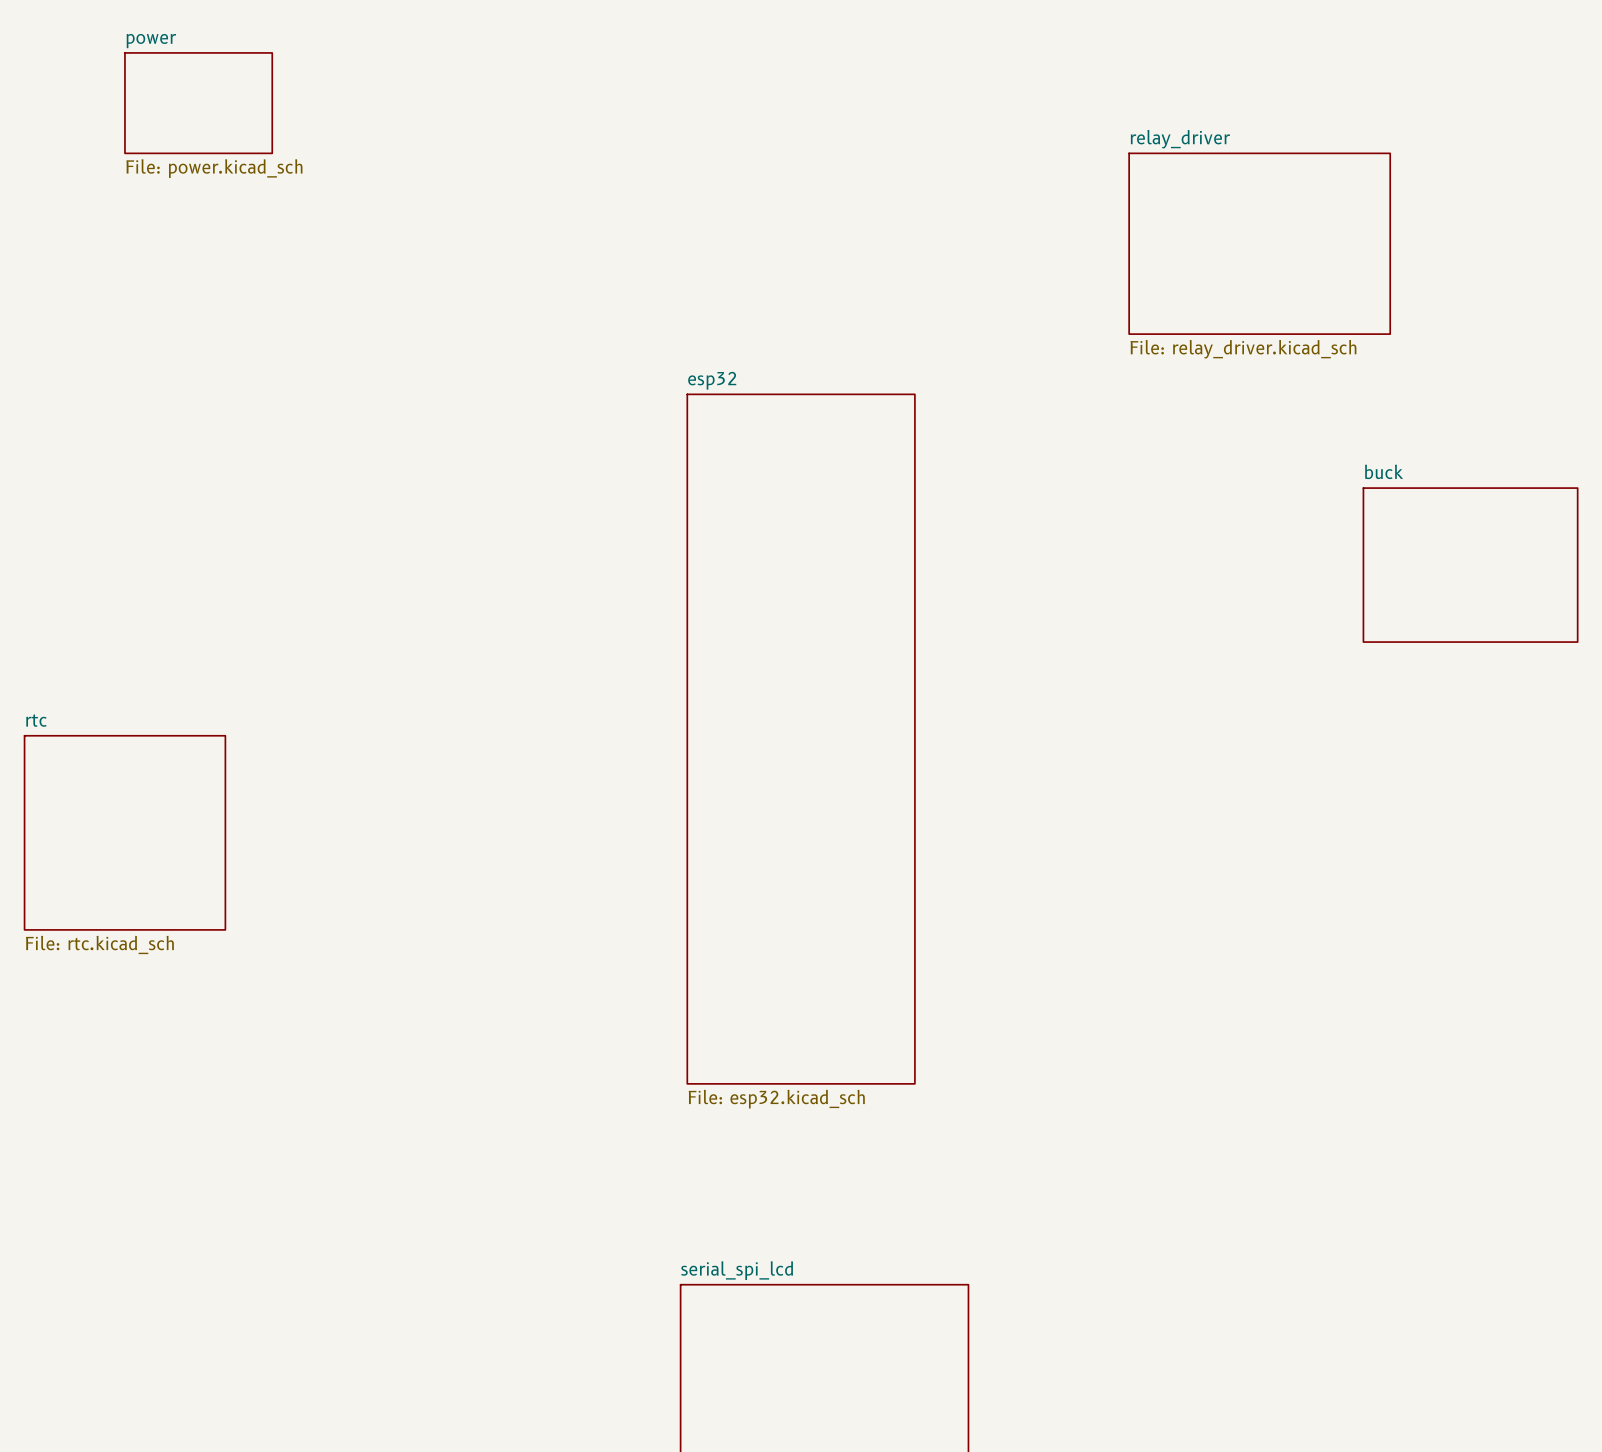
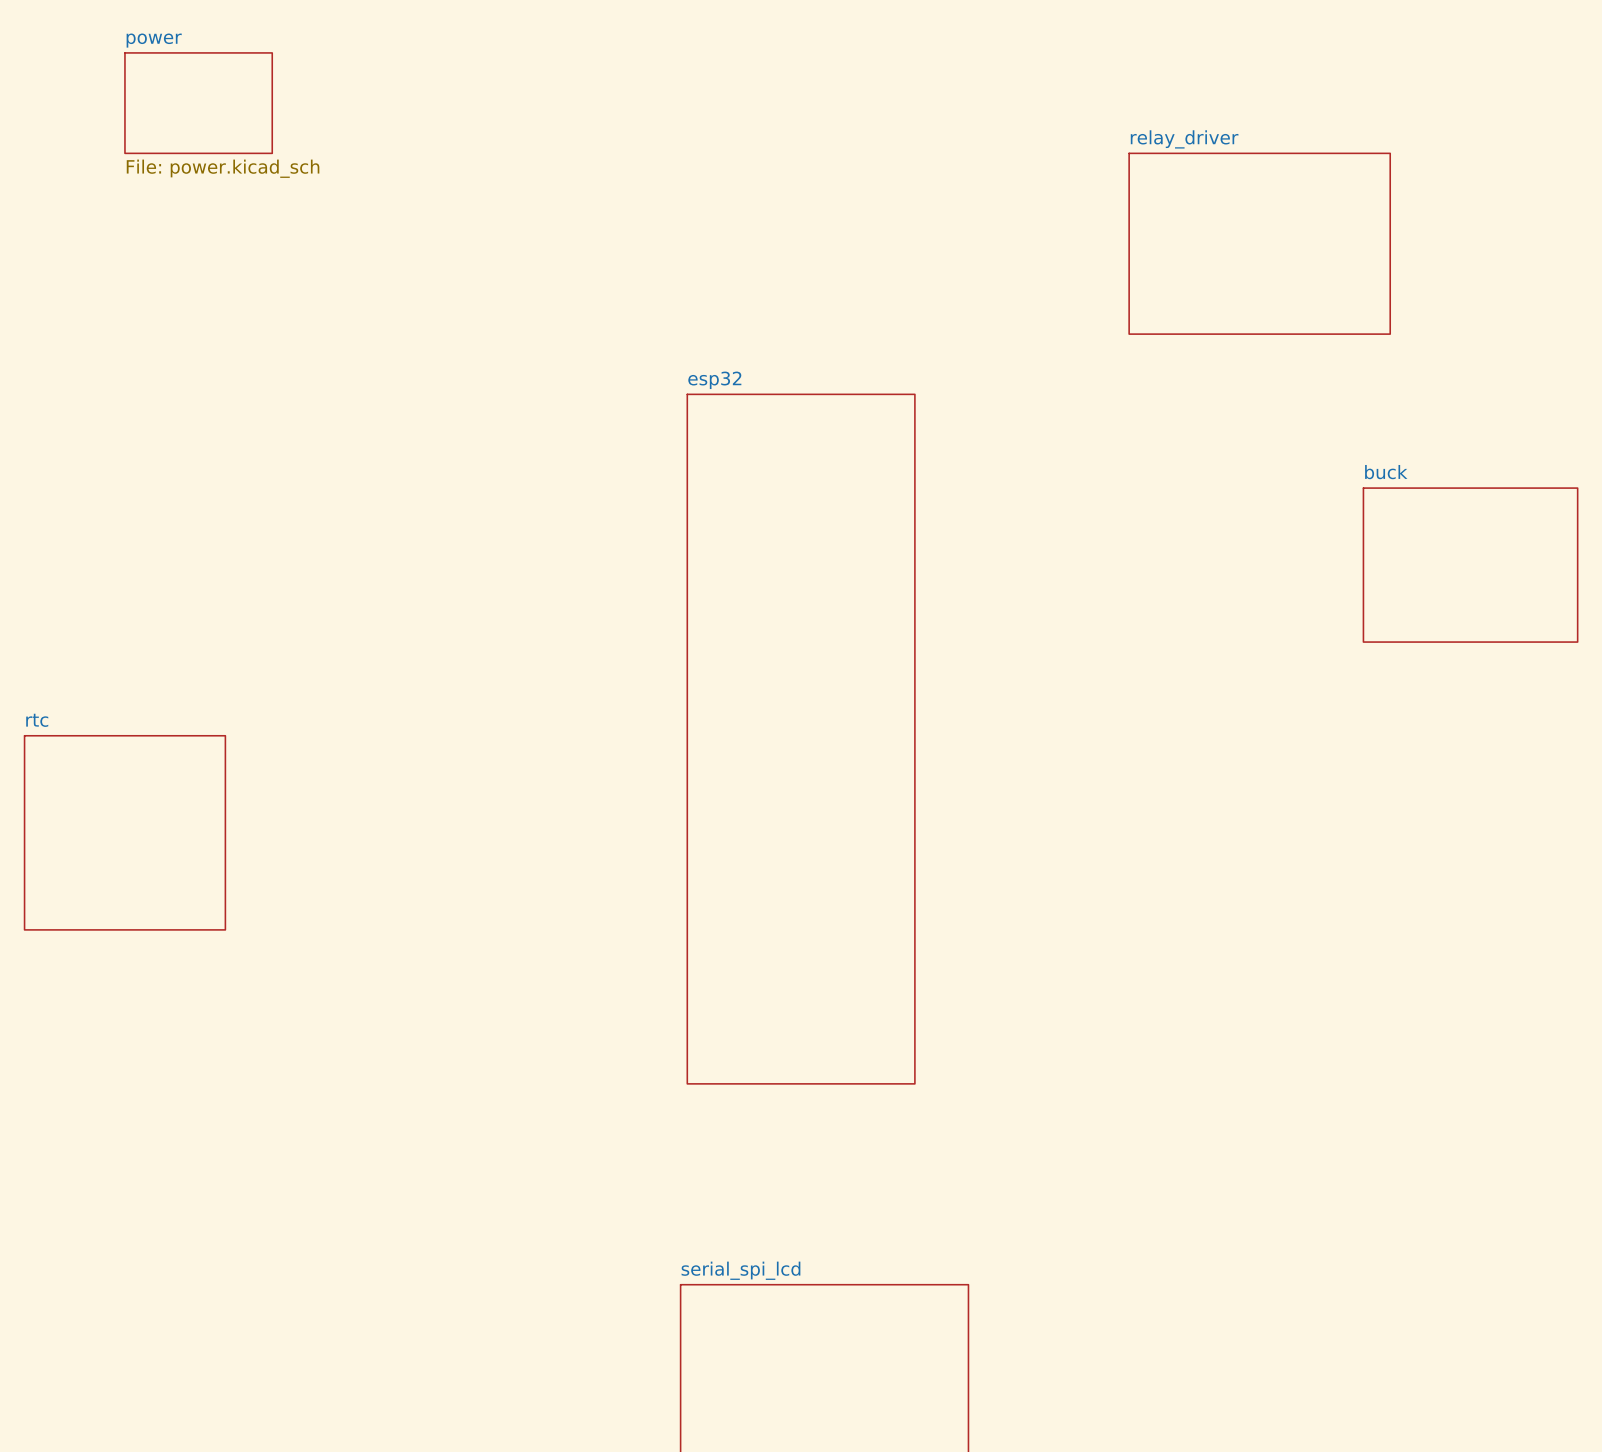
sheet relay_driver value: File: relay_driver.kicad_sch (1243, 349) -> none
sheet rtc value: File: rtc.kicad_sch (99, 944) -> none
sheet esp32 value: File: esp32.kicad_sch (776, 1099) -> none

